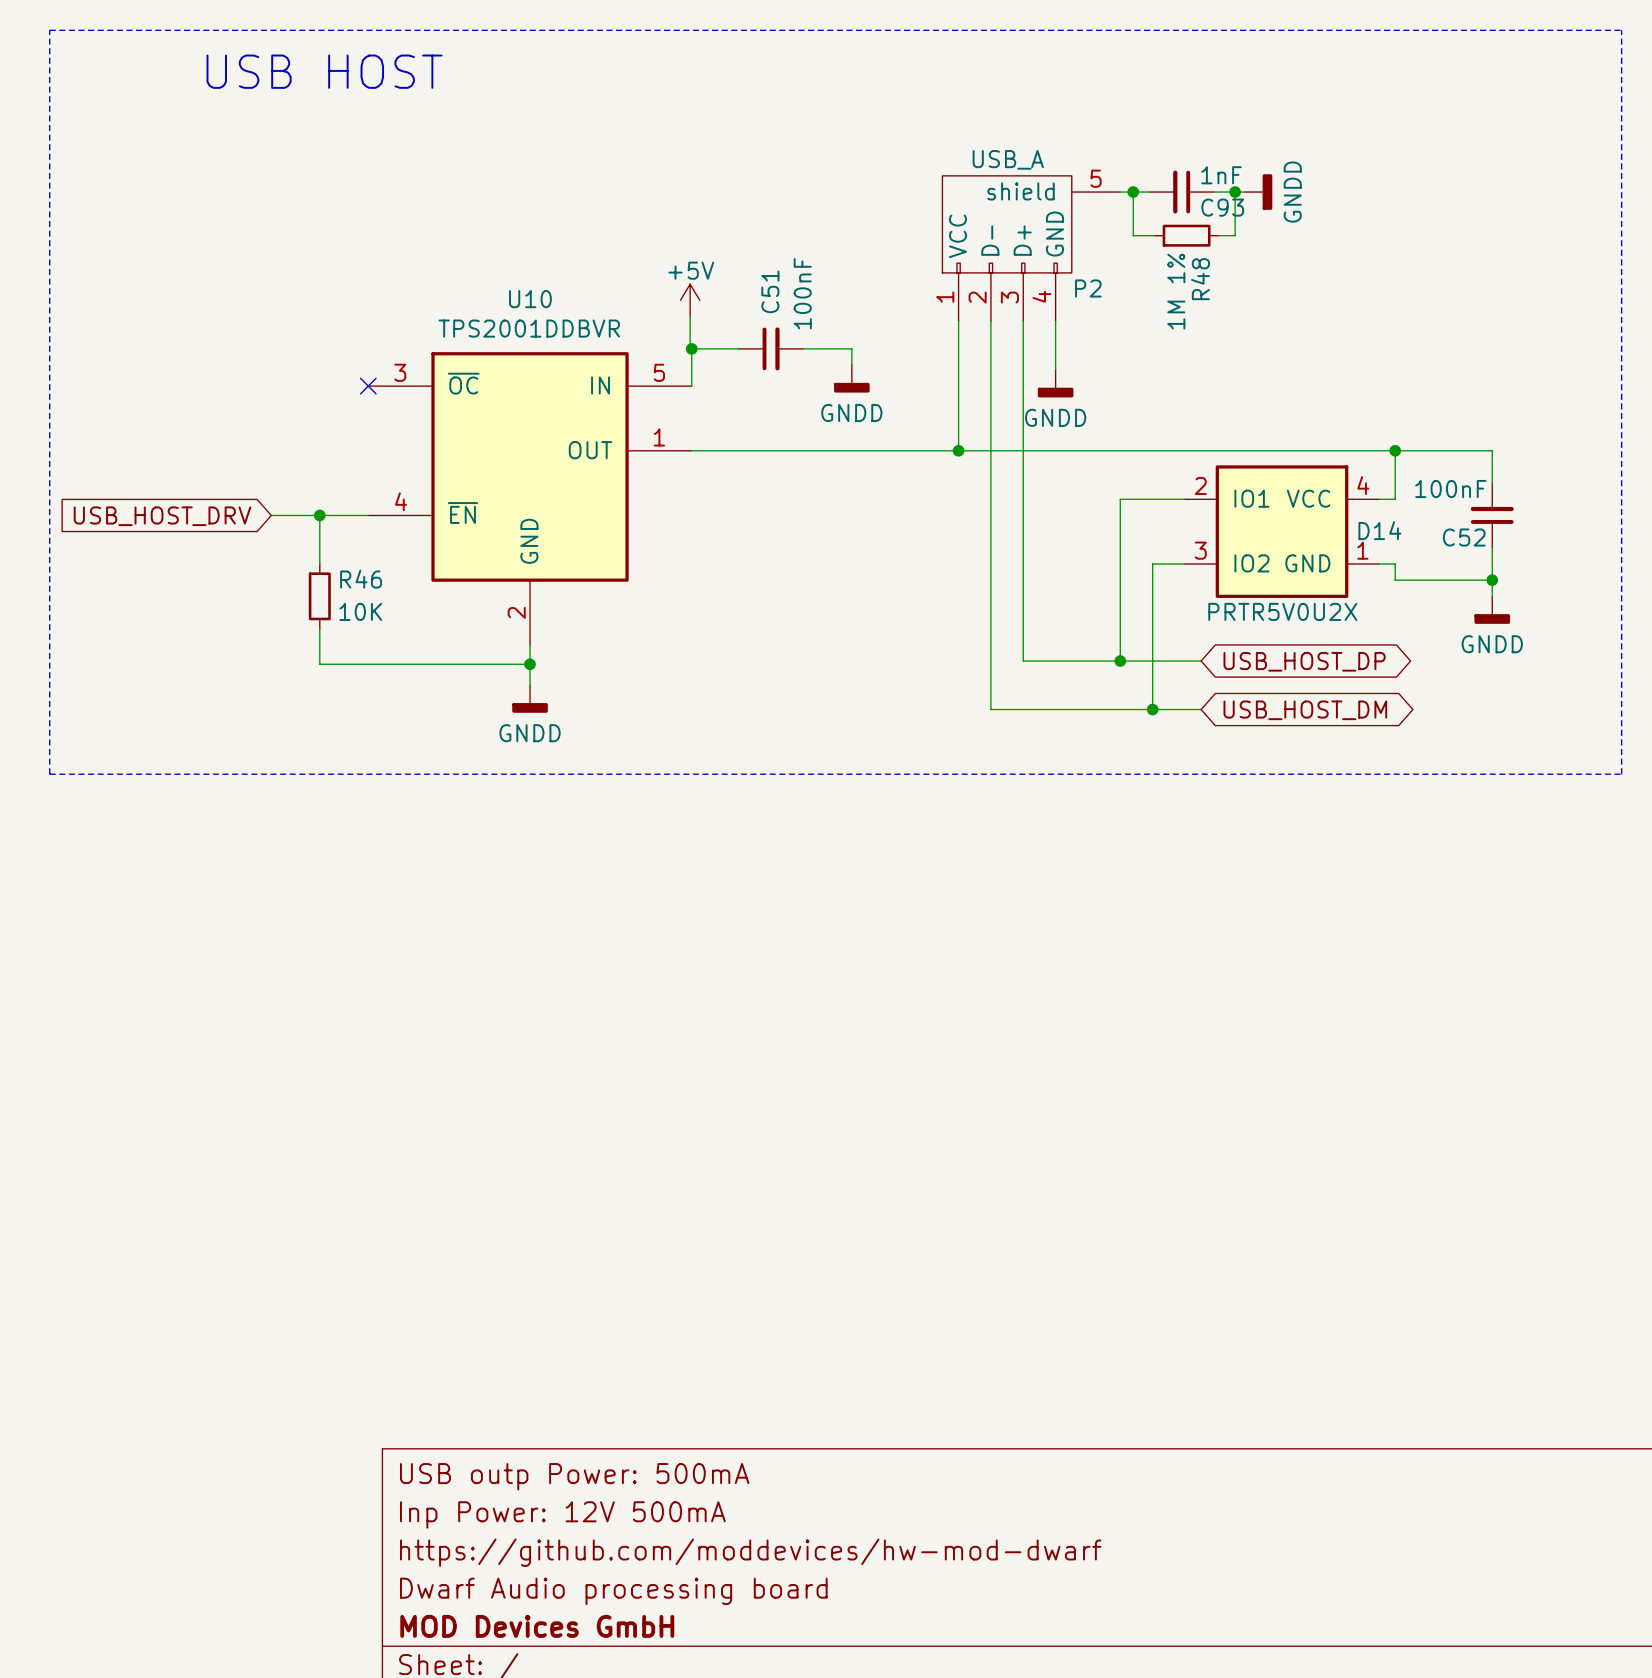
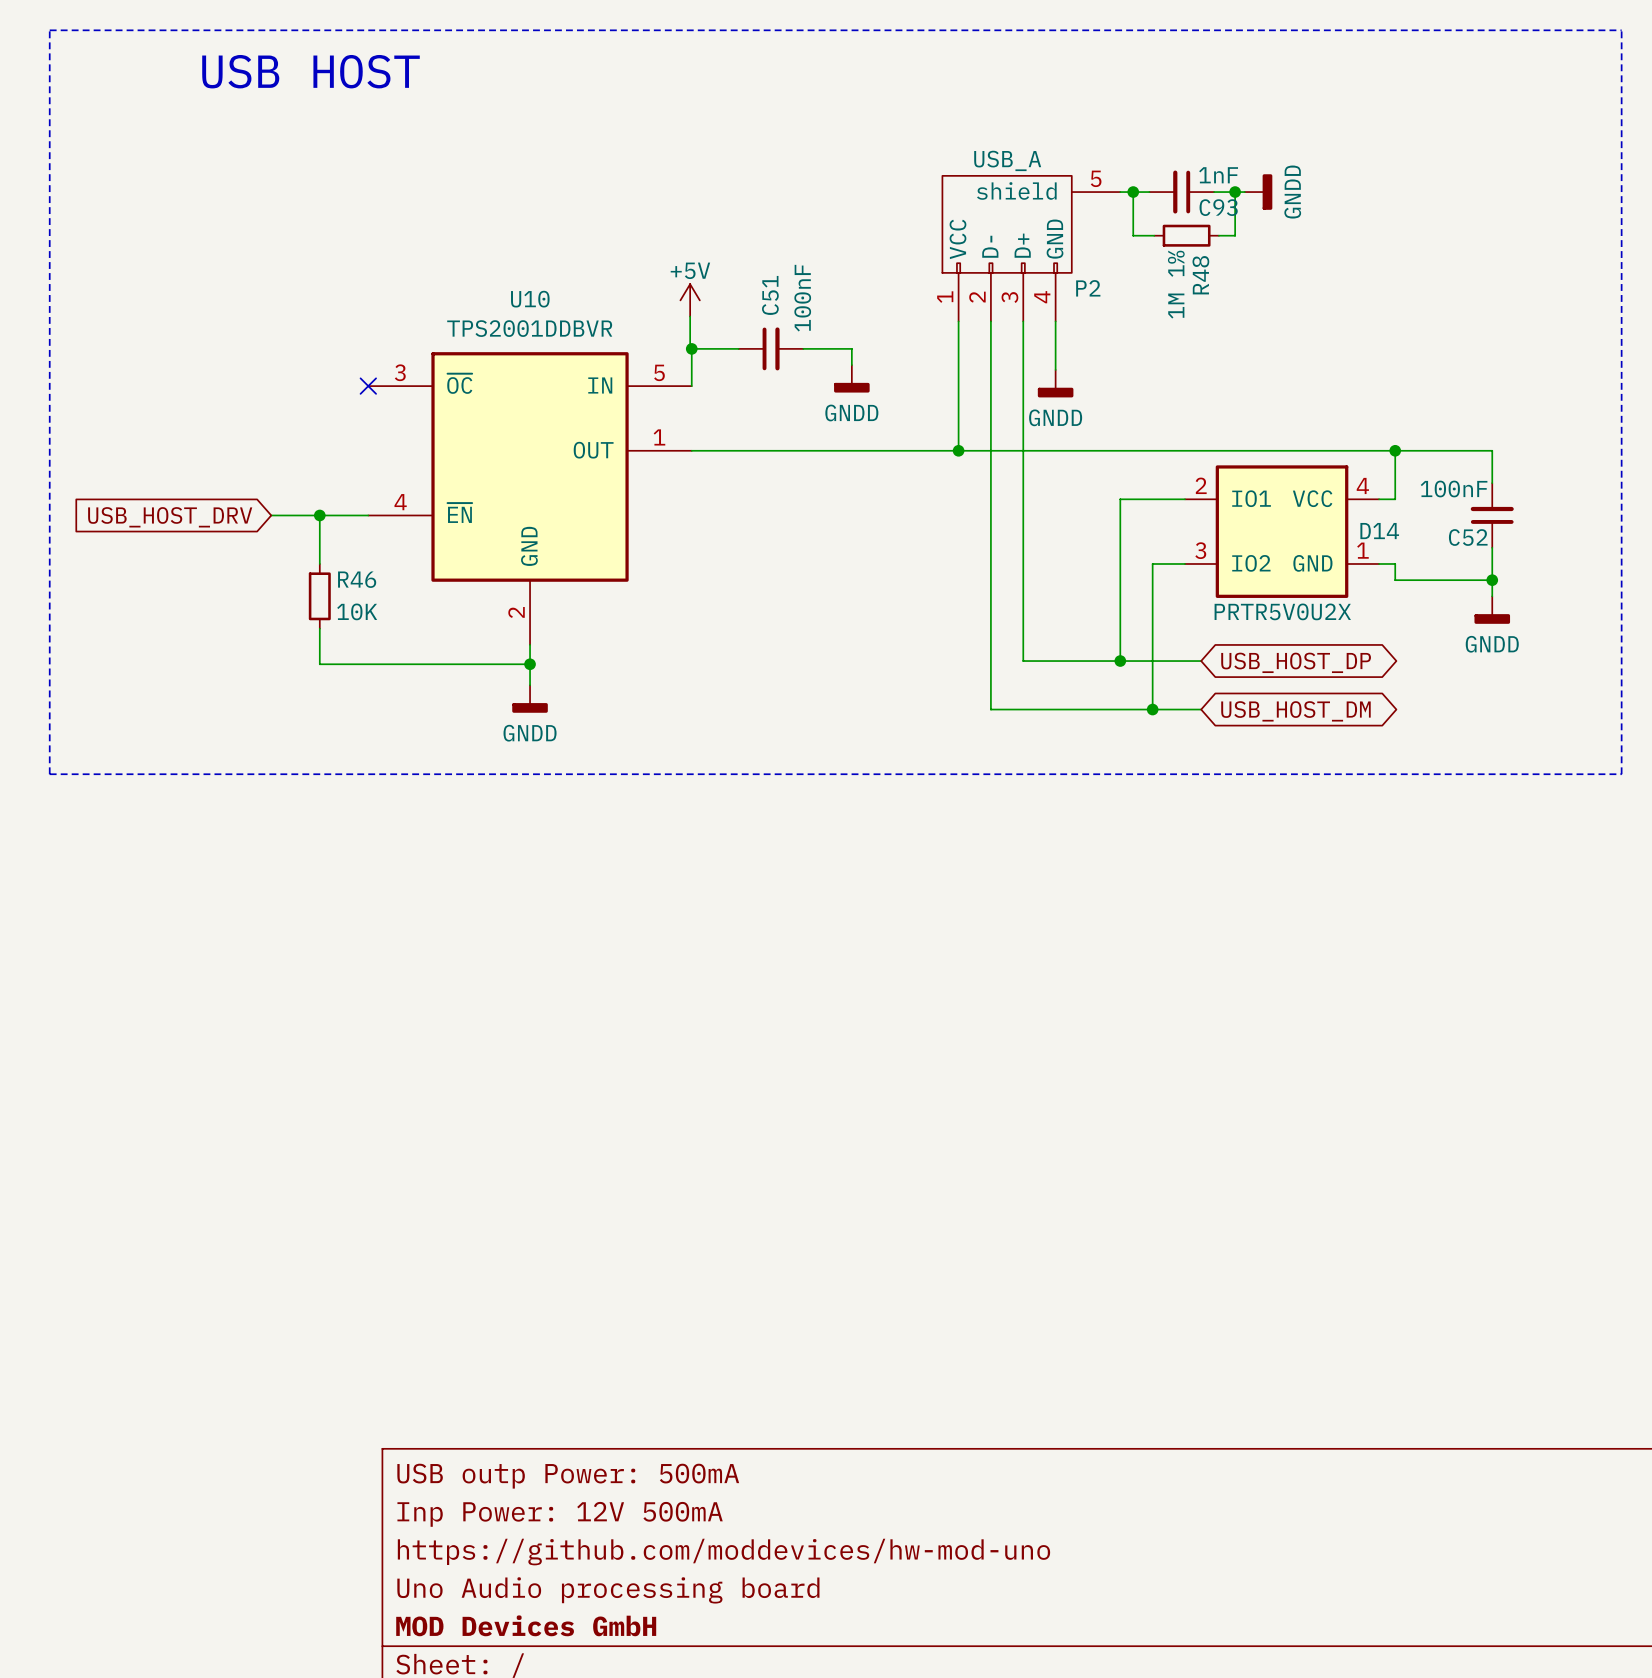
title block: https://github.com/moddevices/hw-mod-dwarf (750, 1552) -> https://github.com/moddevices/hw-mod-uno (723, 1552)
title block: Dwarf Audio processing board (613, 1591) -> Uno Audio processing board (608, 1590)

